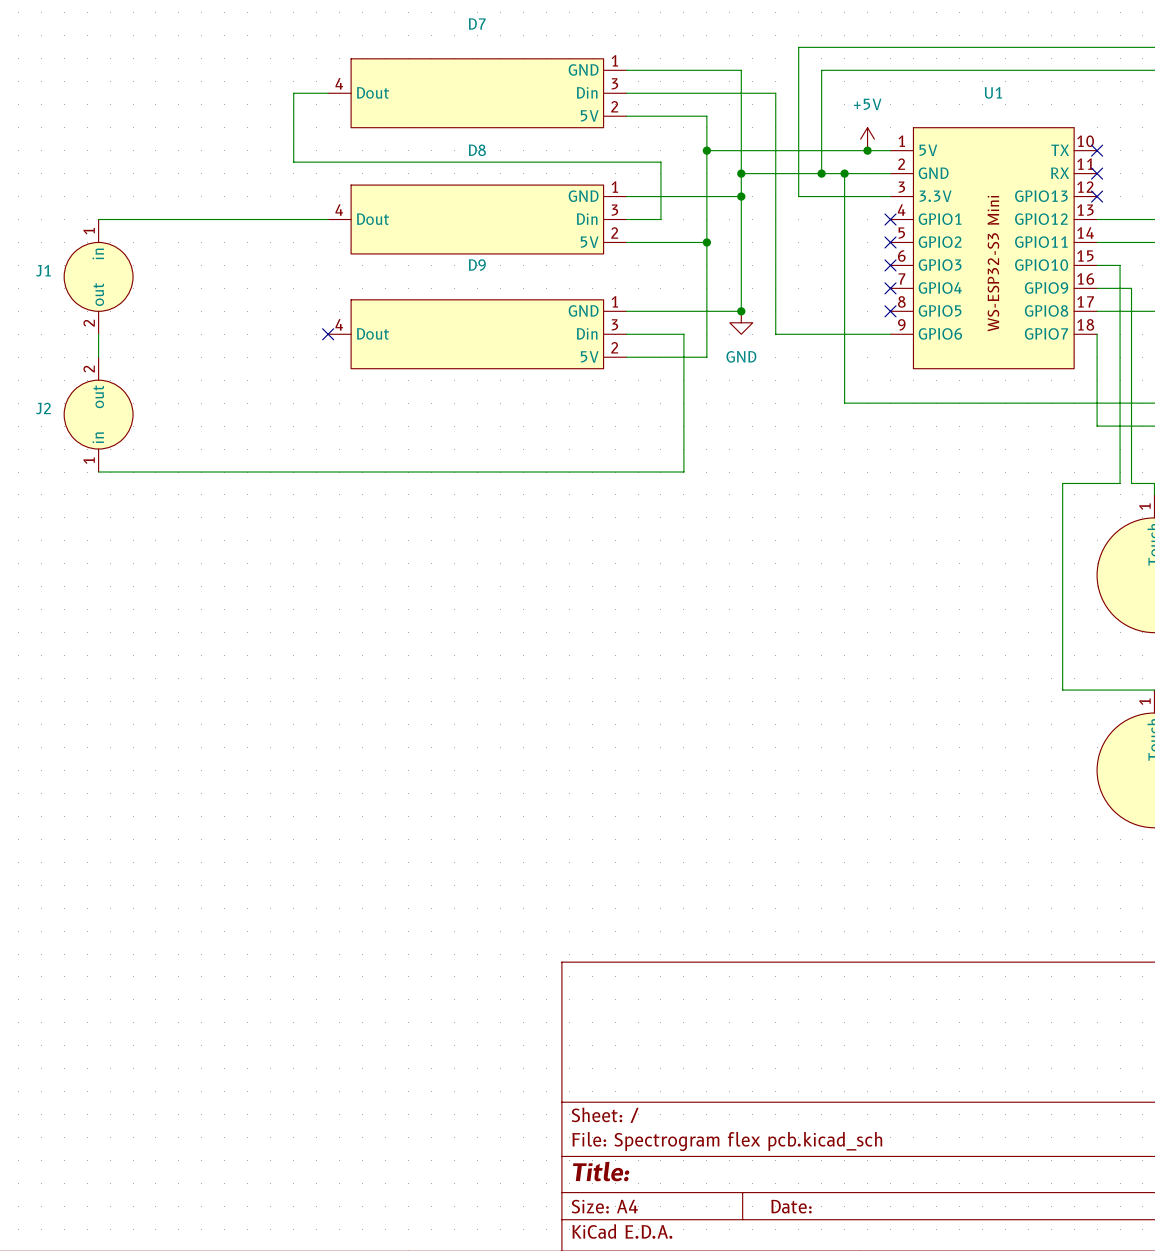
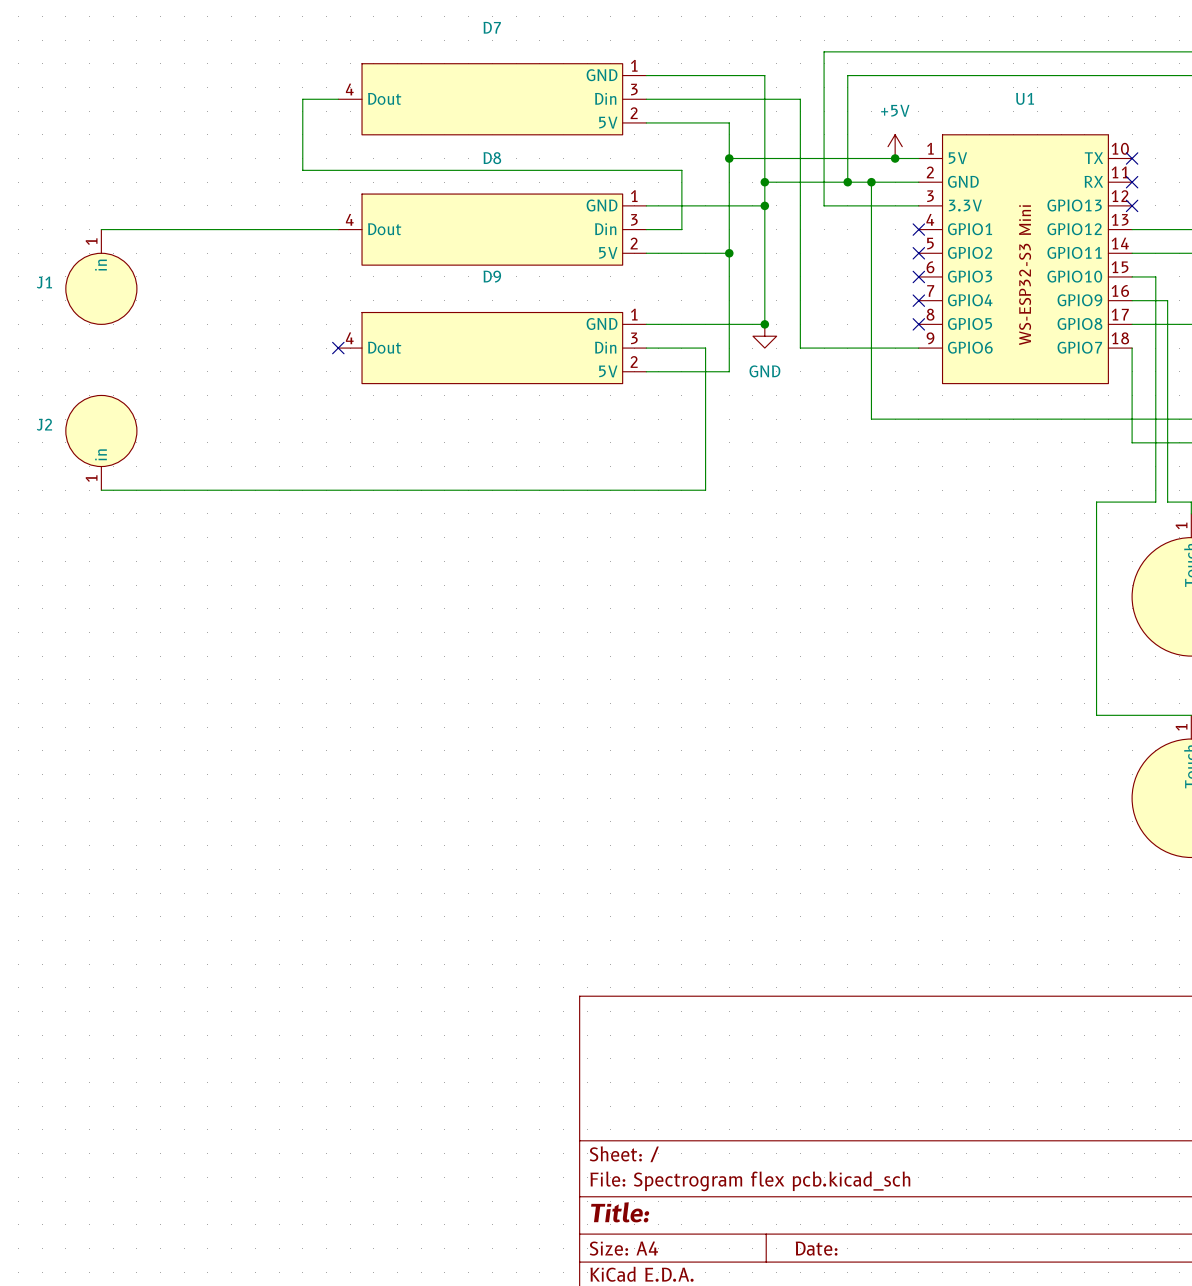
J1 symbol: [64, 219, 134, 335] -> [65, 229, 137, 325]
wire: (98, 334) (98, 357) -> none
J2 symbol: [64, 357, 134, 473] -> [65, 395, 137, 491]

